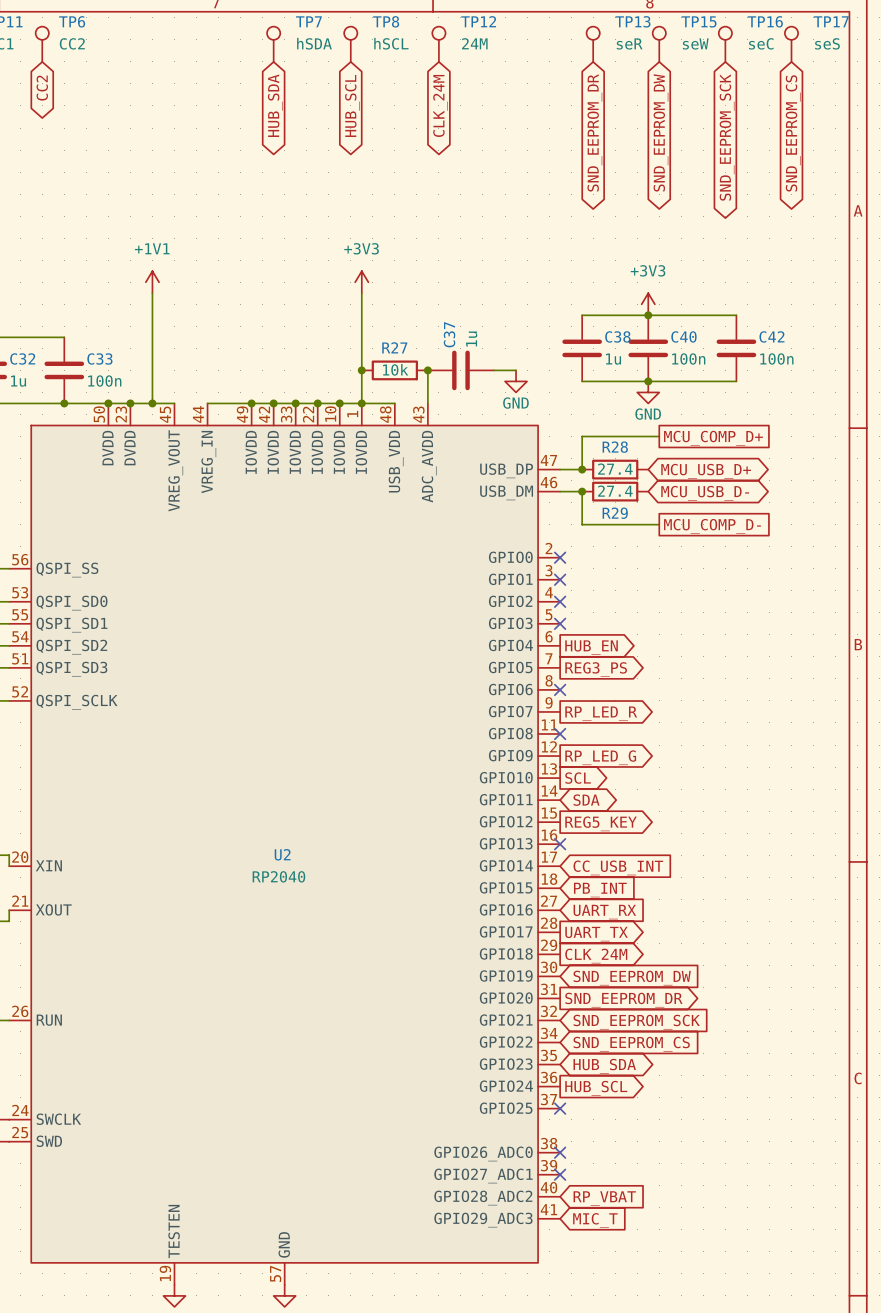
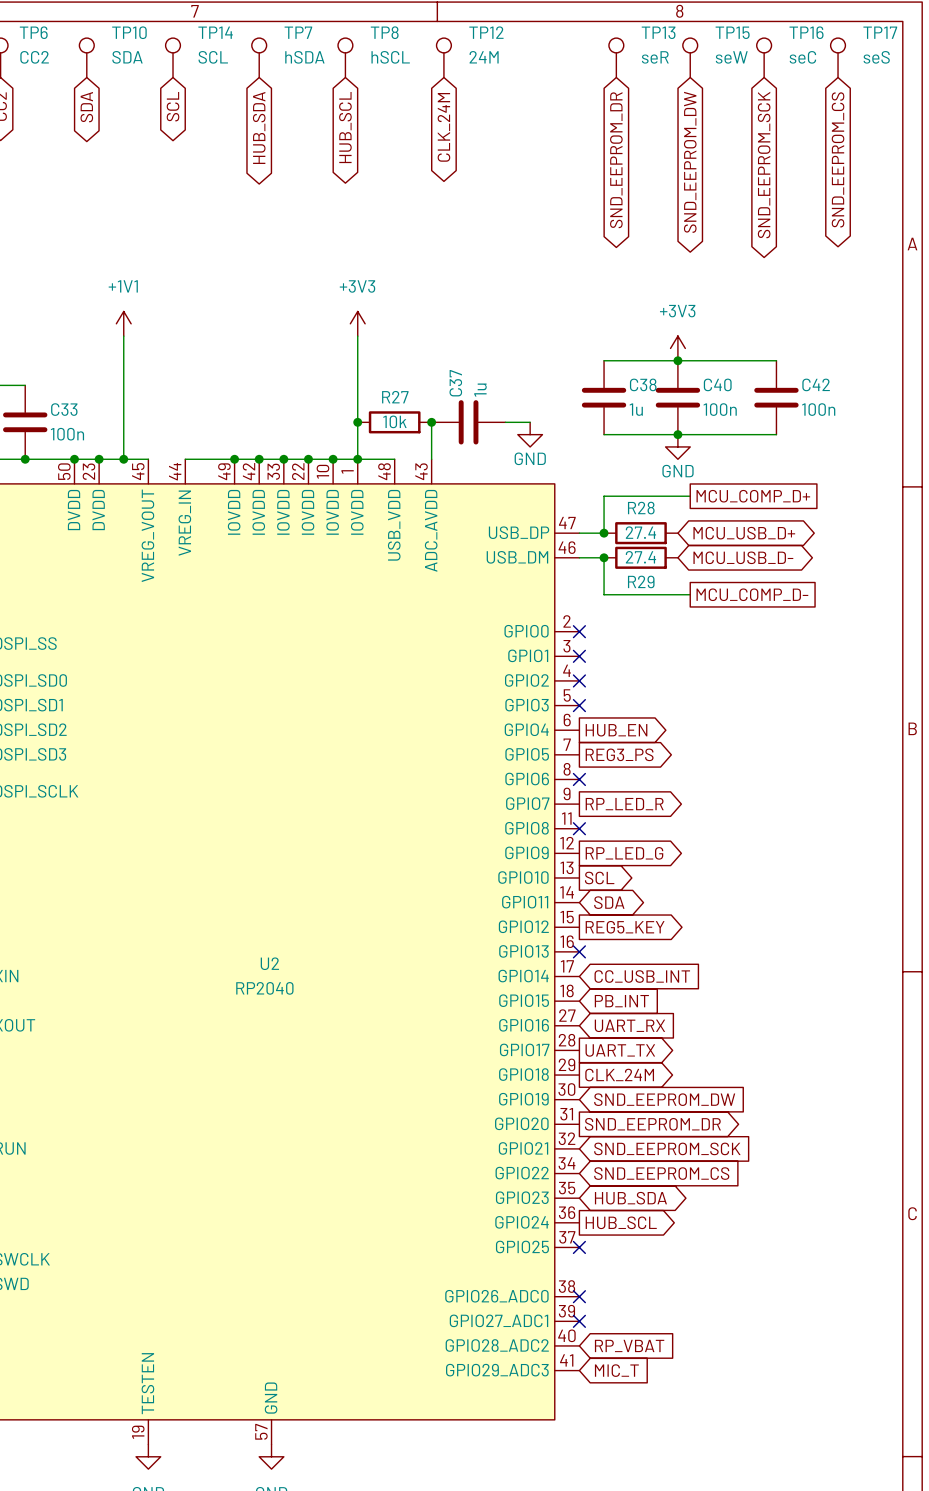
TP10: none -> SDA (86, 57)
TP14: none -> SCL (173, 57)
global label: none -> SDA (86, 107)
global label: none -> SCL (173, 106)

